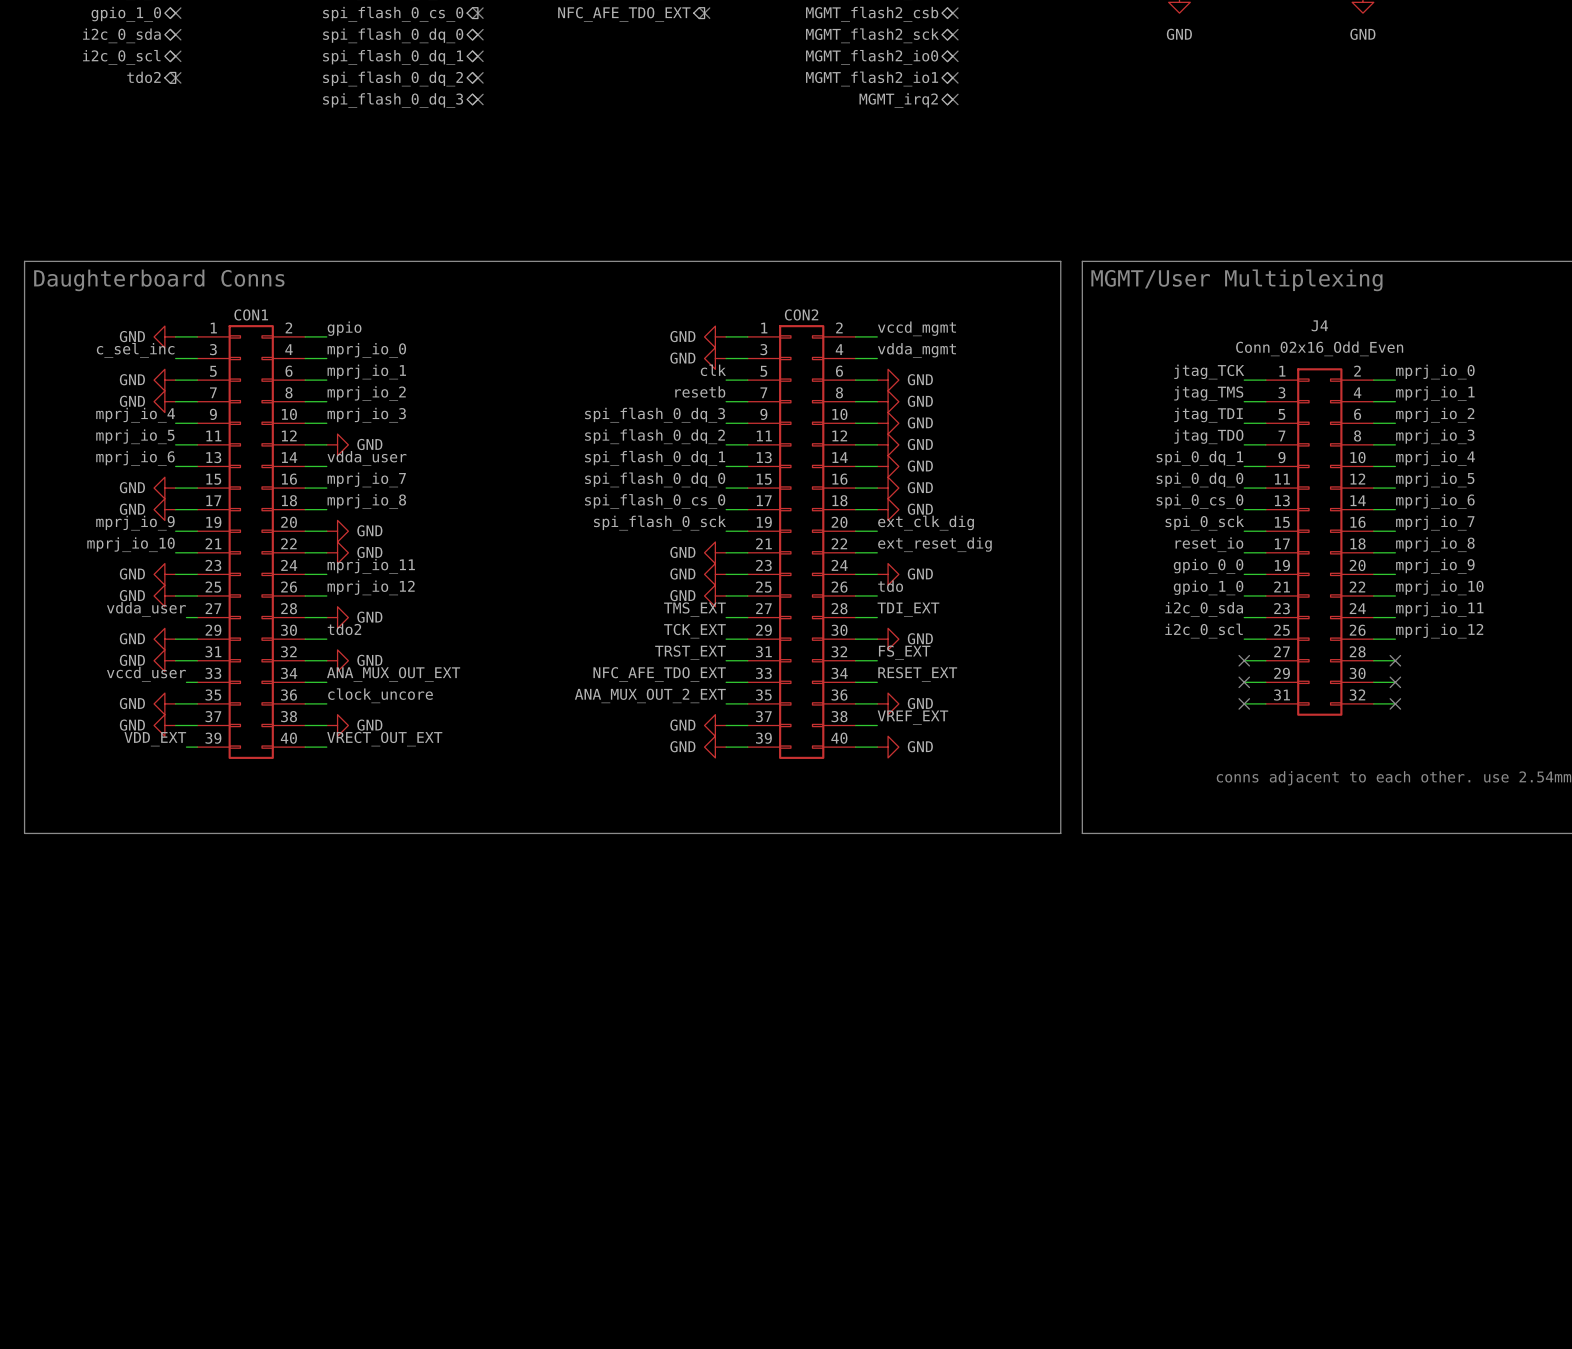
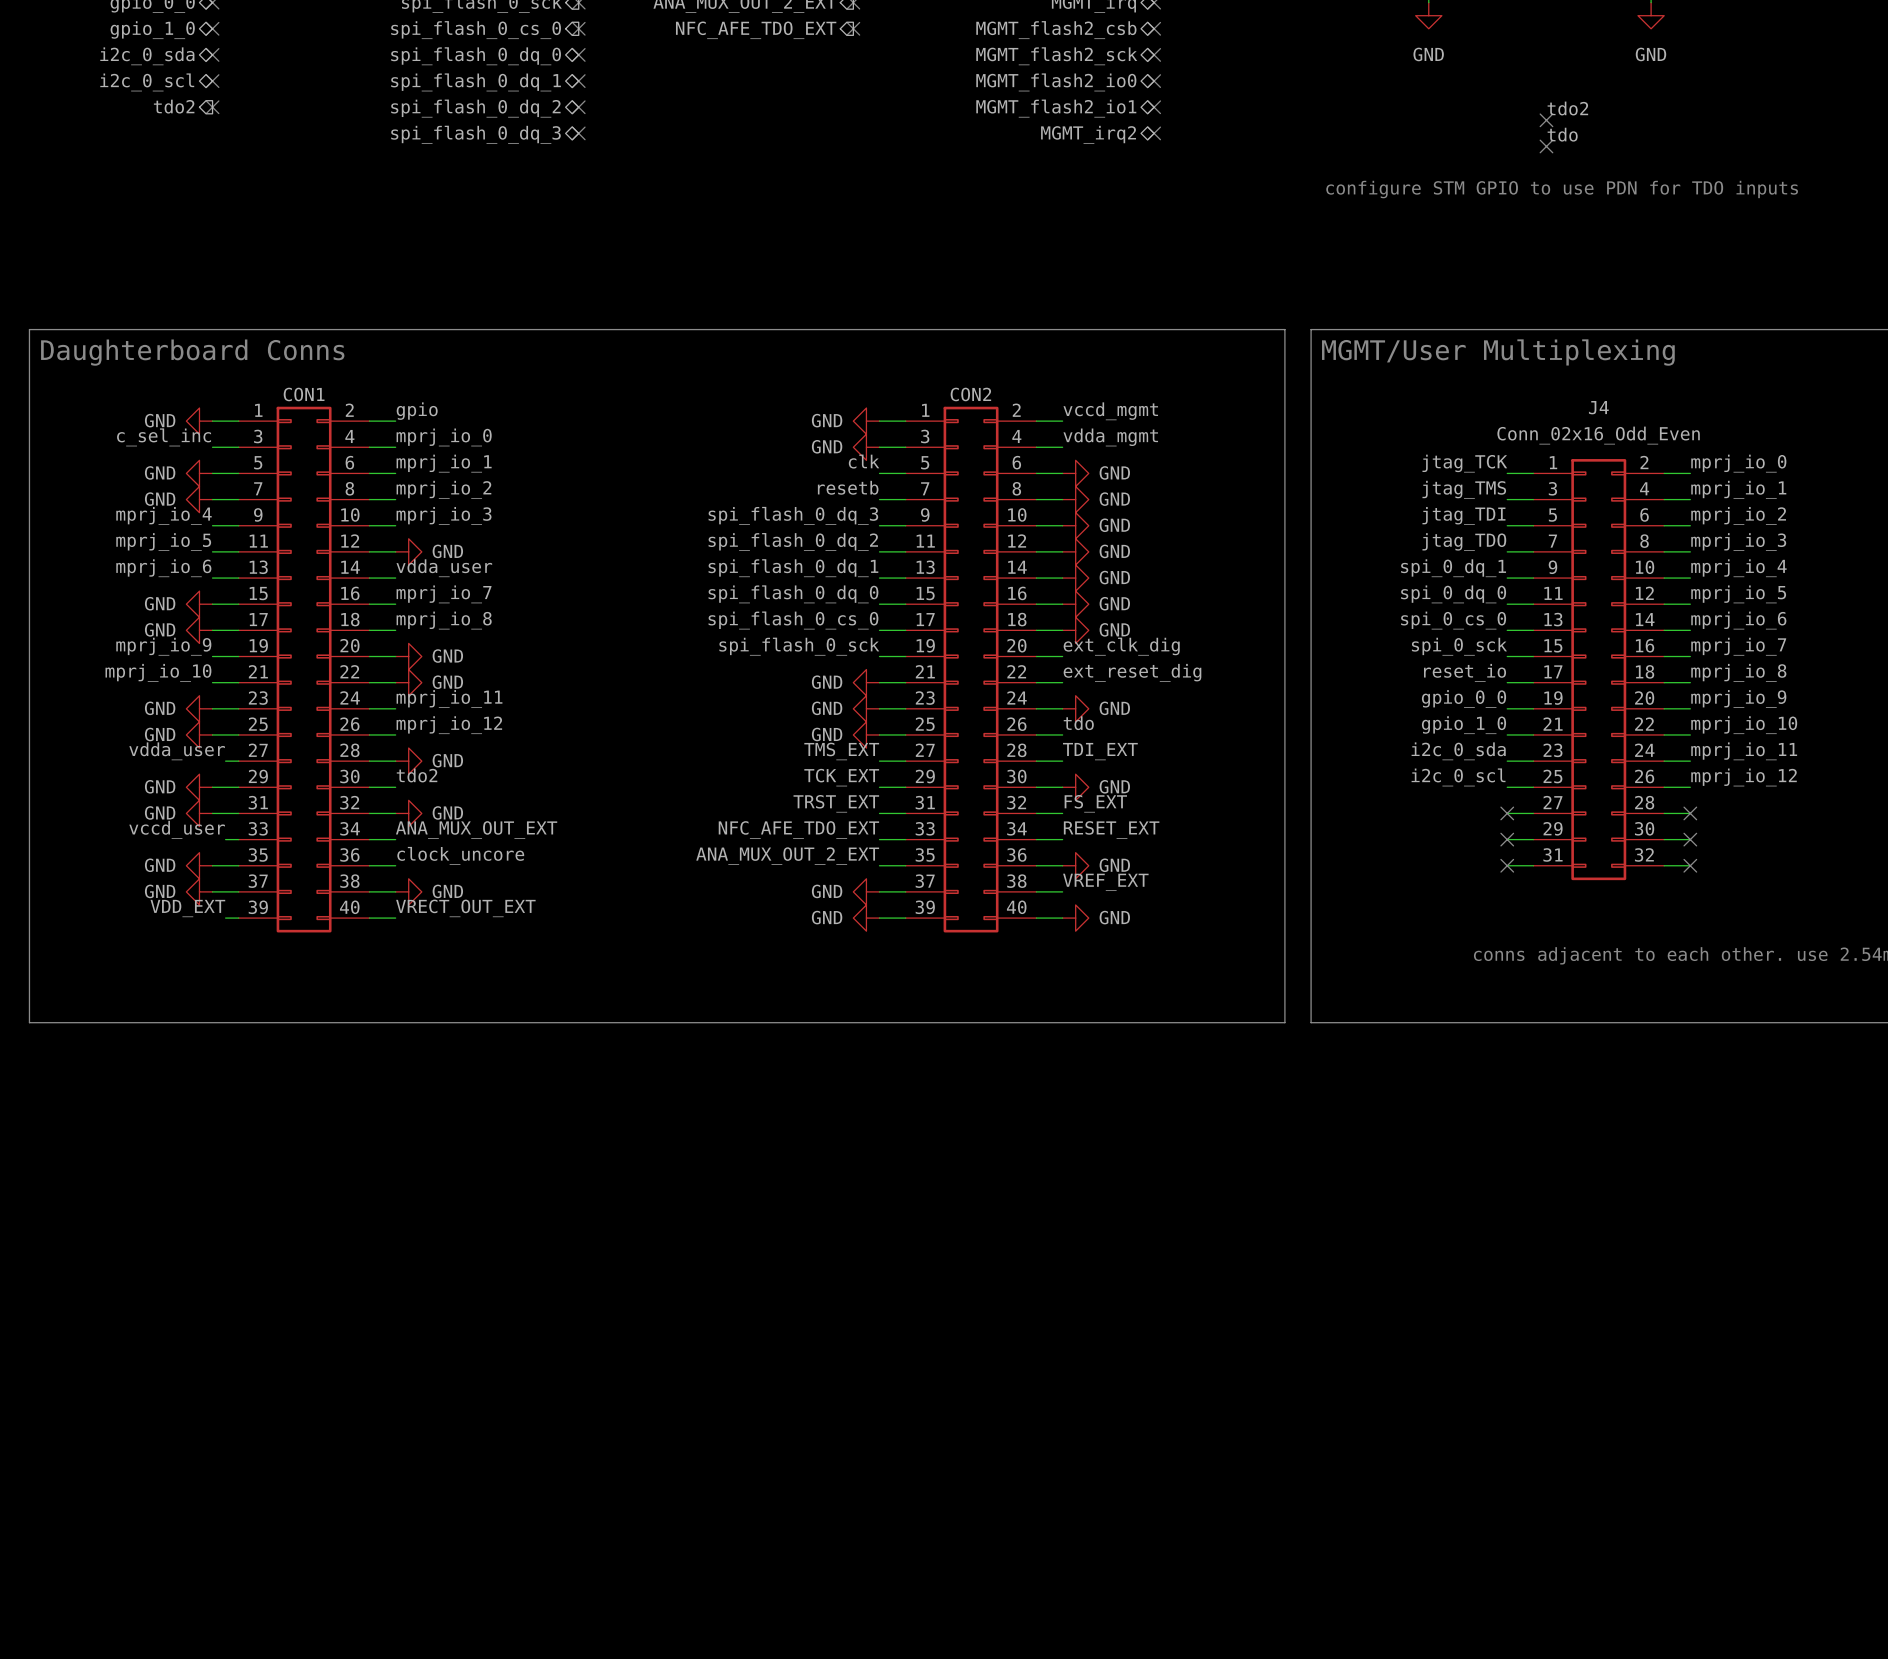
label: none -> tdo2 (1567, 108)
no-connect mark: none -> (1546, 120)
label: none -> tdo (1562, 134)
no-connect mark: none -> (1546, 146)
text: none -> configure STM GPIO to use PDN for TDO inputs (1562, 189)

